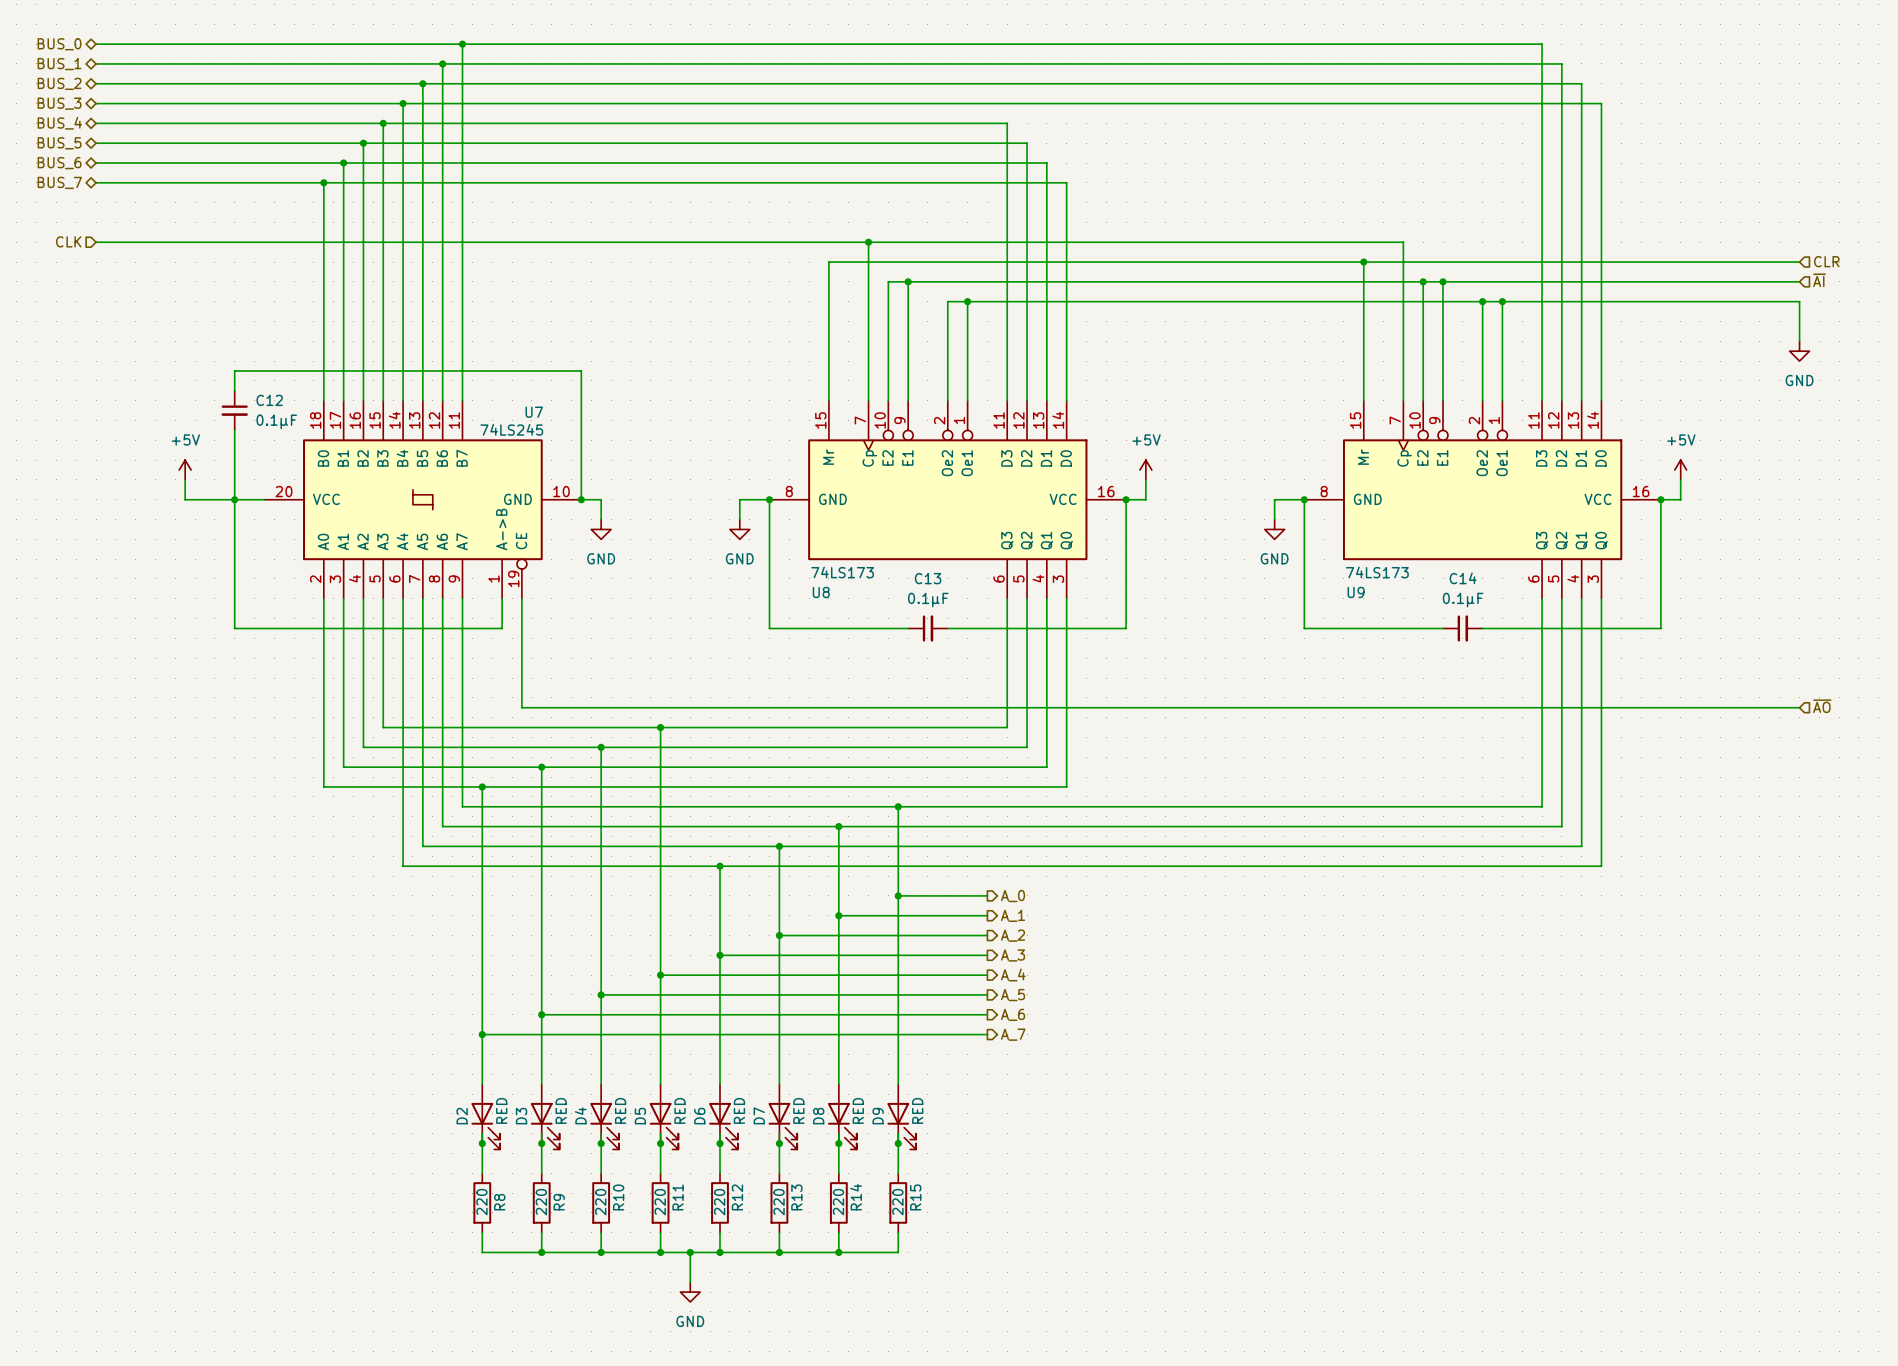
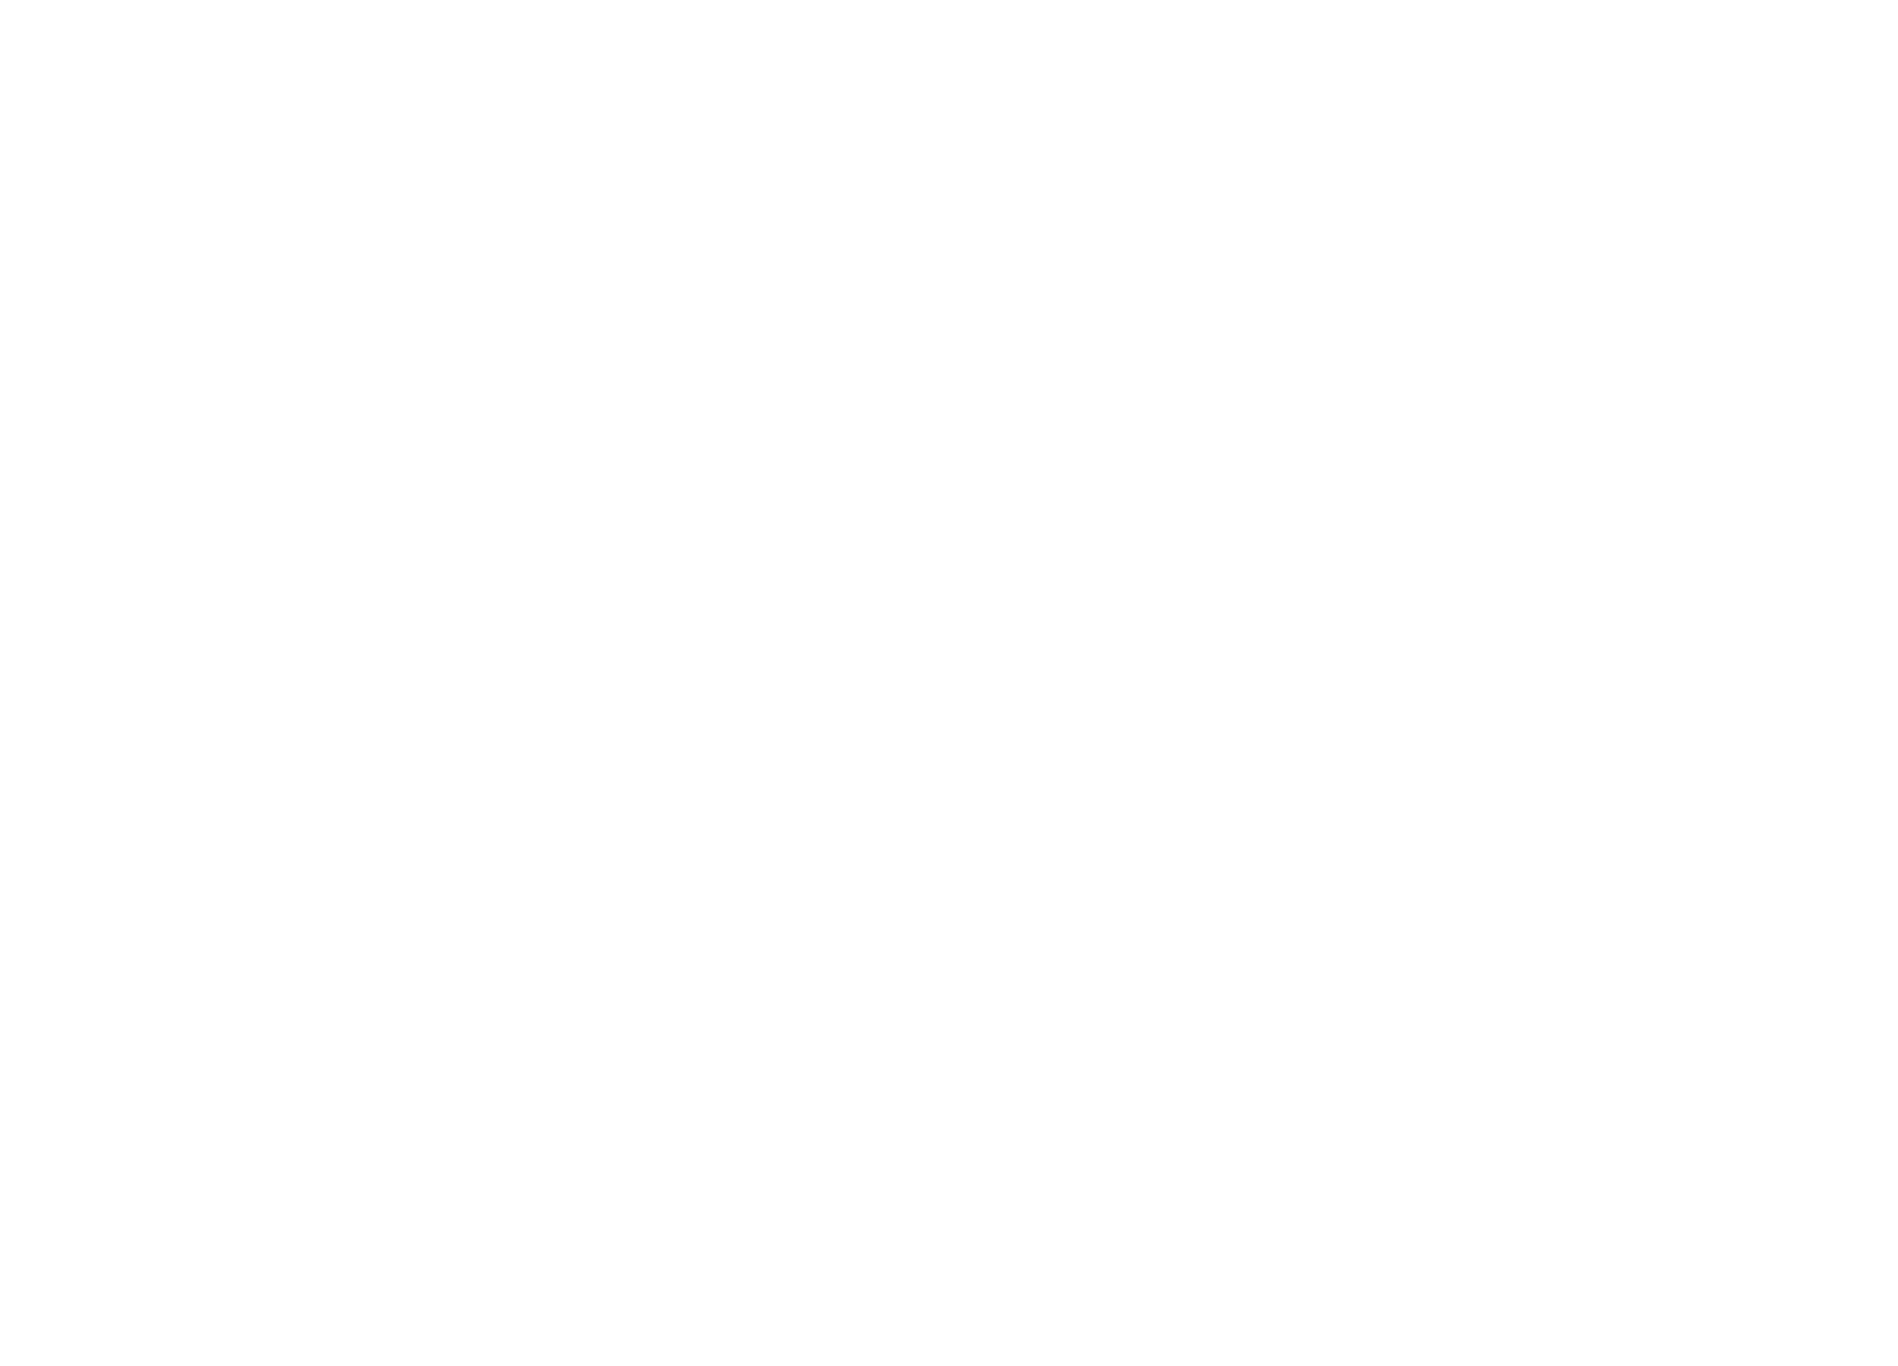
hierarchical label: BUS_0 (59, 44) -> none
wire: (96, 44) (1542, 44) (1542, 400) -> none
wire: (462, 44) (462, 400) -> none
junction: (462, 44) -> none
wire: (96, 63) (1561, 63) (1561, 400) -> none
wire: (442, 63) (442, 400) -> none
junction: (442, 63) -> none
hierarchical label: BUS_1 (59, 64) -> none
hierarchical label: BUS_2 (59, 83) -> none
wire: (96, 83) (1581, 83) (1581, 400) -> none
wire: (422, 83) (422, 400) -> none
junction: (422, 83) -> none
hierarchical label: BUS_3 (59, 103) -> none
wire: (96, 103) (1601, 103) (1601, 400) -> none
wire: (403, 103) (403, 400) -> none
junction: (403, 103) -> none
hierarchical label: BUS_4 (59, 123) -> none
wire: (96, 123) (1007, 123) (1007, 400) -> none
wire: (383, 123) (383, 400) -> none
junction: (383, 123) -> none
hierarchical label: BUS_5 (59, 143) -> none
wire: (96, 143) (1027, 143) (1027, 400) -> none
wire: (363, 143) (363, 400) -> none
junction: (363, 143) -> none
hierarchical label: BUS_6 (59, 163) -> none
wire: (96, 163) (1046, 163) (1046, 400) -> none
wire: (343, 163) (343, 400) -> none
junction: (343, 163) -> none
hierarchical label: BUS_7 (59, 182) -> none
wire: (96, 182) (1066, 182) (1066, 400) -> none
wire: (323, 182) (323, 400) -> none
junction: (323, 182) -> none
hierarchical label: CLK (68, 241) -> none
wire: (96, 242) (1403, 242) (1403, 400) -> none
wire: (868, 242) (868, 400) -> none
junction: (868, 242) -> none
hierarchical label: CLR (1826, 261) -> none
wire: (1363, 262) (1363, 400) -> none
junction: (1363, 262) -> none
wire: (1799, 262) (828, 262) (828, 400) -> none
hierarchical label: ~{AI} (1819, 280) -> none
wire: (908, 281) (908, 400) -> none
junction: (908, 281) -> none
wire: (1423, 281) (1423, 400) -> none
junction: (1423, 281) -> none
wire: (1443, 281) (1443, 400) -> none
junction: (1443, 281) -> none
wire: (1799, 281) (888, 281) (888, 400) -> none
wire: (967, 301) (967, 400) -> none
junction: (967, 301) -> none
wire: (1482, 301) (1482, 400) -> none
junction: (1482, 301) -> none
wire: (1502, 301) (1502, 400) -> none
junction: (1502, 301) -> none
wire: (1799, 341) (1799, 301) (947, 301) (947, 400) -> none
power symbol: GND (1799, 351) -> none
wire: (234, 390) (234, 370) (581, 370) (581, 499) (601, 499) (601, 519) -> none
C12: 0.1μF (234, 410) -> none
wire: (234, 430) (234, 628) (502, 628) (502, 598) -> none
power symbol: +5V (185, 470) -> none
power symbol: +5V (1145, 470) -> none
power symbol: +5V (1680, 470) -> none
wire: (185, 479) (185, 499) (264, 499) -> none
wire: (1145, 479) (1145, 499) (1126, 499) (1126, 628) (947, 628) -> none
wire: (1680, 479) (1680, 499) (1660, 499) (1660, 628) (1482, 628) -> none
junction: (234, 499) -> none
U7: 74LS245 (422, 499) -> none
junction: (581, 499) -> none
junction: (769, 499) -> none
U8: 74LS173 (947, 499) -> none
junction: (1126, 499) -> none
junction: (1304, 499) -> none
U9: 74LS173 (1482, 499) -> none
junction: (1660, 499) -> none
wire: (739, 519) (739, 499) (769, 499) (769, 628) (908, 628) -> none
wire: (1274, 519) (1274, 499) (1304, 499) (1304, 628) (1443, 628) -> none
power symbol: GND (601, 529) -> none
power symbol: GND (739, 529) -> none
power symbol: GND (1274, 529) -> none
wire: (323, 598) (323, 786) (1066, 786) (1066, 598) -> none
wire: (343, 598) (343, 767) (1046, 767) (1046, 598) -> none
wire: (363, 598) (363, 747) (1027, 747) (1027, 598) -> none
wire: (383, 598) (383, 727) (1007, 727) (1007, 598) -> none
wire: (403, 598) (403, 866) (1601, 866) (1601, 598) -> none
wire: (422, 598) (422, 846) (1581, 846) (1581, 598) -> none
wire: (442, 598) (442, 826) (1561, 826) (1561, 598) -> none
wire: (462, 598) (462, 806) (1542, 806) (1542, 598) -> none
wire: (521, 598) (521, 707) (1799, 707) -> none
C13: 0.1μF (927, 628) -> none
C14: 0.1μF (1462, 628) -> none
hierarchical label: ~{AO} (1822, 706) -> none
wire: (660, 727) (660, 1084) -> none
junction: (660, 727) -> none
wire: (601, 747) (601, 1084) -> none
junction: (601, 747) -> none
wire: (541, 767) (541, 1084) -> none
junction: (541, 767) -> none
wire: (482, 786) (482, 1084) -> none
junction: (482, 786) -> none
wire: (898, 806) (898, 1084) -> none
junction: (898, 806) -> none
wire: (838, 826) (838, 1084) -> none
junction: (838, 826) -> none
wire: (779, 846) (779, 1084) -> none
junction: (779, 846) -> none
wire: (719, 866) (719, 1084) -> none
junction: (719, 866) -> none
wire: (898, 895) (987, 895) -> none
junction: (898, 895) -> none
hierarchical label: A_0 (1013, 896) -> none
wire: (838, 915) (987, 915) -> none
junction: (838, 915) -> none
hierarchical label: A_1 (1013, 915) -> none
wire: (779, 935) (987, 935) -> none
junction: (779, 935) -> none
hierarchical label: A_2 (1013, 935) -> none
wire: (719, 955) (987, 955) -> none
junction: (719, 955) -> none
hierarchical label: A_3 (1013, 955) -> none
wire: (660, 975) (987, 975) -> none
junction: (660, 975) -> none
hierarchical label: A_4 (1013, 975) -> none
wire: (601, 994) (987, 994) -> none
junction: (601, 994) -> none
hierarchical label: A_5 (1013, 995) -> none
wire: (541, 1014) (987, 1014) -> none
junction: (541, 1014) -> none
hierarchical label: A_6 (1013, 1014) -> none
wire: (482, 1034) (987, 1034) -> none
junction: (482, 1034) -> none
hierarchical label: A_7 (1013, 1034) -> none
D2: RED (485, 1116) -> none
D3: RED (545, 1116) -> none
D4: RED (604, 1116) -> none
D5: RED (664, 1116) -> none
D6: RED (723, 1116) -> none
D7: RED (782, 1116) -> none
D8: RED (842, 1116) -> none
D9: RED (901, 1116) -> none
wire: (482, 1133) (482, 1173) -> none
wire: (541, 1133) (541, 1173) -> none
wire: (601, 1133) (601, 1173) -> none
wire: (660, 1133) (660, 1173) -> none
wire: (719, 1133) (719, 1173) -> none
wire: (779, 1133) (779, 1173) -> none
wire: (838, 1133) (838, 1173) -> none
wire: (898, 1133) (898, 1173) -> none
junction: (482, 1143) -> none
junction: (541, 1143) -> none
junction: (601, 1143) -> none
junction: (660, 1143) -> none
junction: (719, 1143) -> none
junction: (779, 1143) -> none
junction: (838, 1143) -> none
junction: (898, 1143) -> none
R8: 220 (482, 1202) -> none
R9: 220 (541, 1202) -> none
R10: 220 (601, 1202) -> none
R11: 220 (660, 1202) -> none
R12: 220 (719, 1202) -> none
R13: 220 (779, 1202) -> none
R14: 220 (838, 1202) -> none
R15: 220 (898, 1202) -> none
wire: (482, 1232) (482, 1252) (898, 1252) (898, 1232) -> none
wire: (541, 1232) (541, 1252) -> none
wire: (601, 1232) (601, 1252) -> none
wire: (660, 1232) (660, 1252) -> none
wire: (719, 1232) (719, 1252) -> none
wire: (779, 1232) (779, 1252) -> none
wire: (838, 1232) (838, 1252) -> none
junction: (541, 1252) -> none
junction: (601, 1252) -> none
junction: (660, 1252) -> none
wire: (690, 1252) (690, 1282) -> none
junction: (690, 1252) -> none
junction: (719, 1252) -> none
junction: (779, 1252) -> none
junction: (838, 1252) -> none
power symbol: GND (690, 1292) -> none

